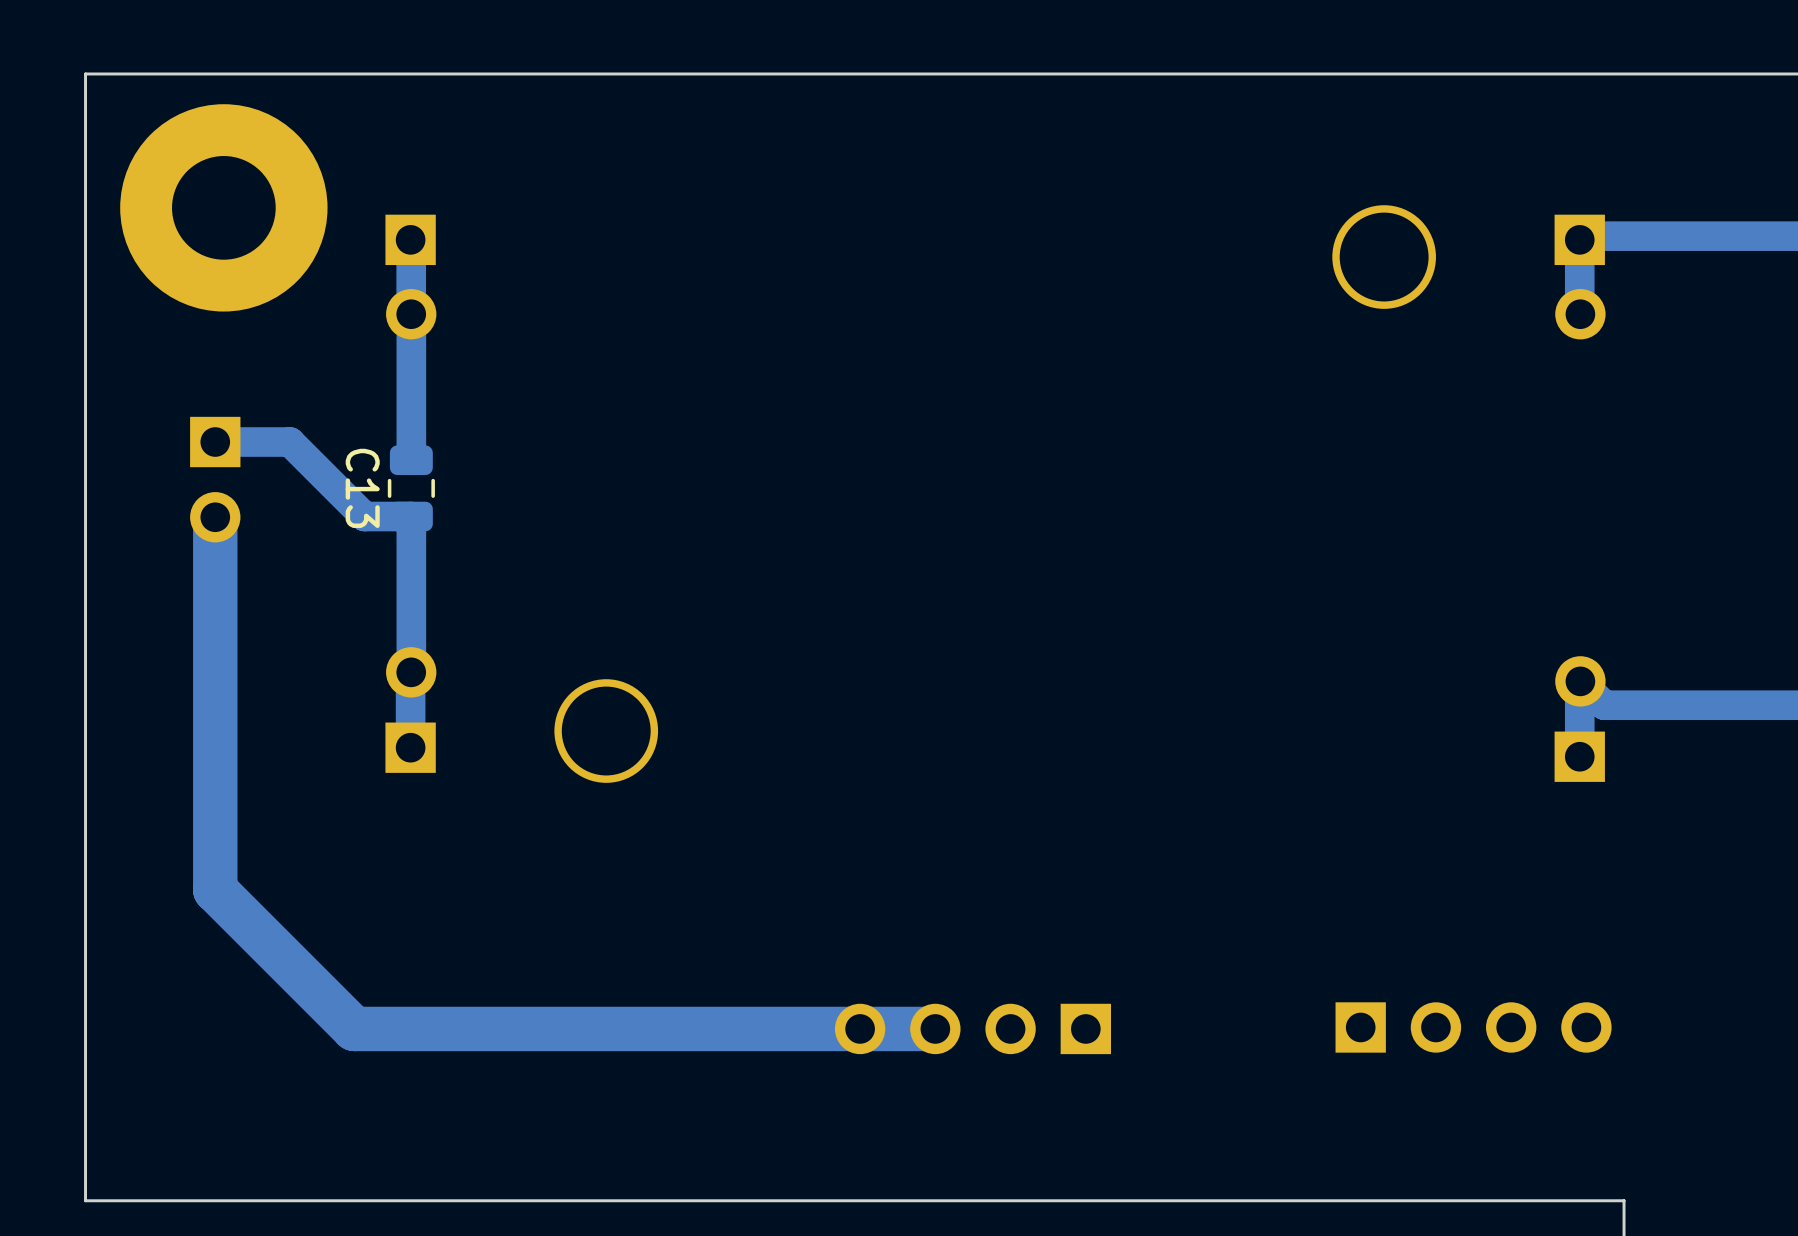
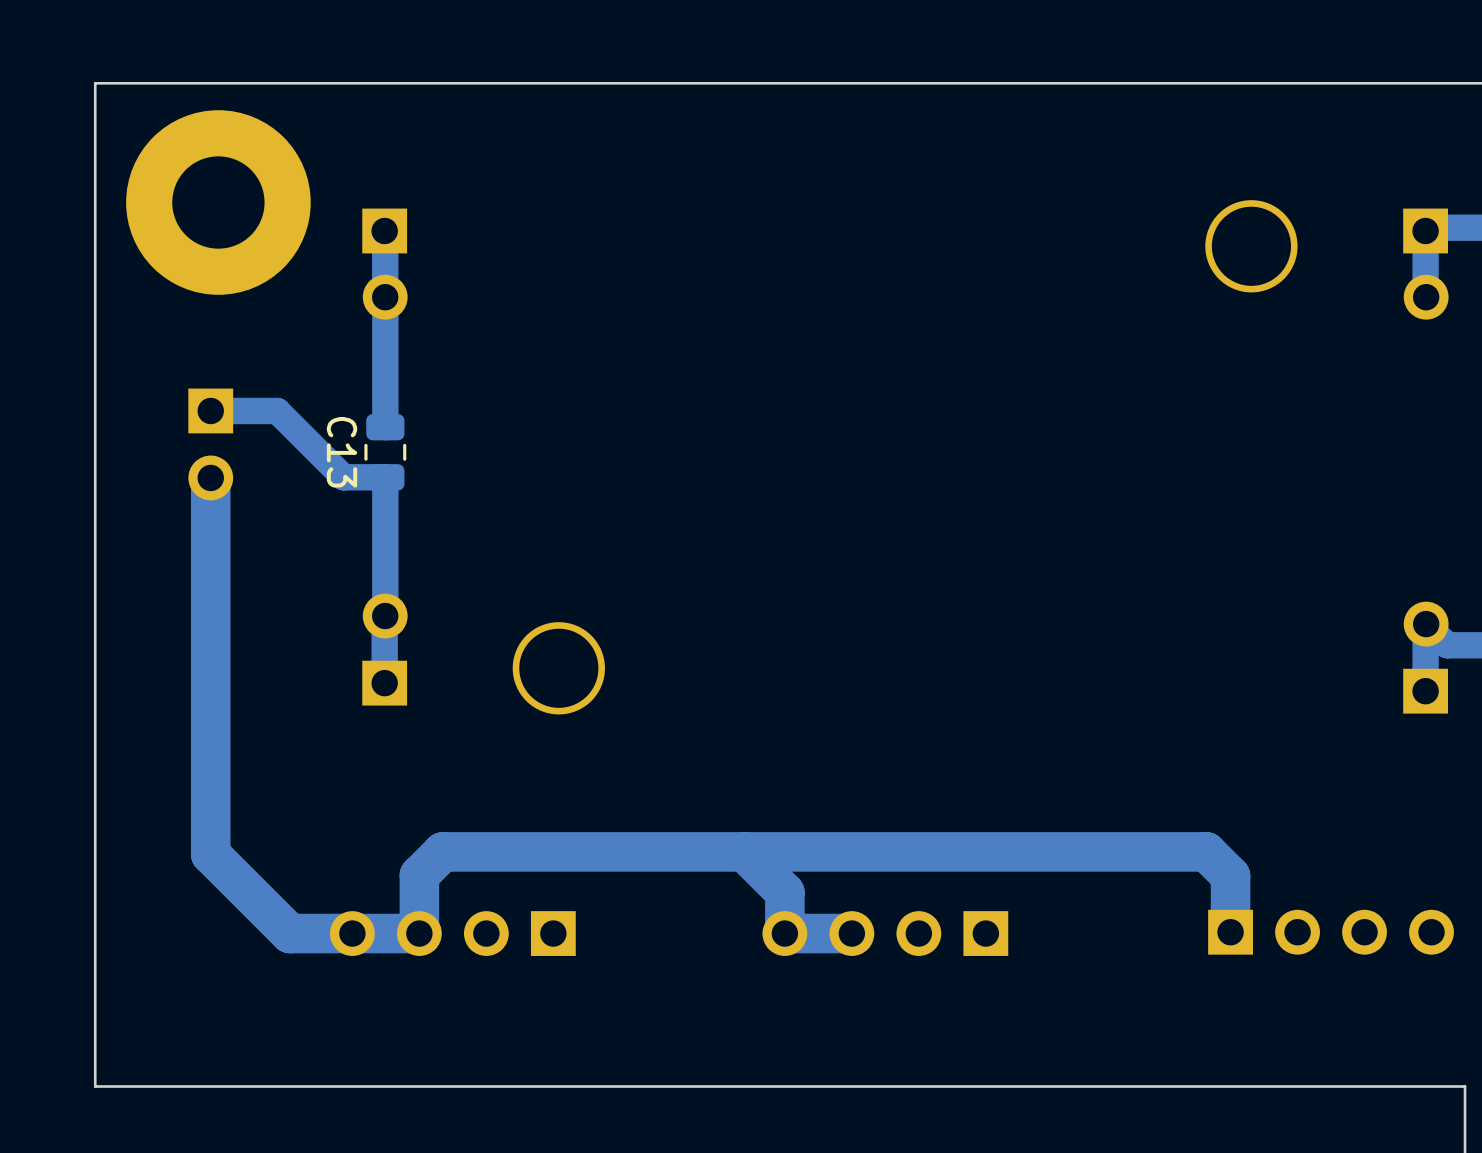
track: (215, 890) (354, 1028) -> (210, 809) (210, 854) (290, 933) (334, 933)
track: none -> (1230, 932) (1230, 876) (1206, 851) (442, 851) (419, 875) (419, 933)
part: none -> (452, 933)
track: (860, 1028) (449, 1028) -> (784, 933) (784, 892) (744, 851)

